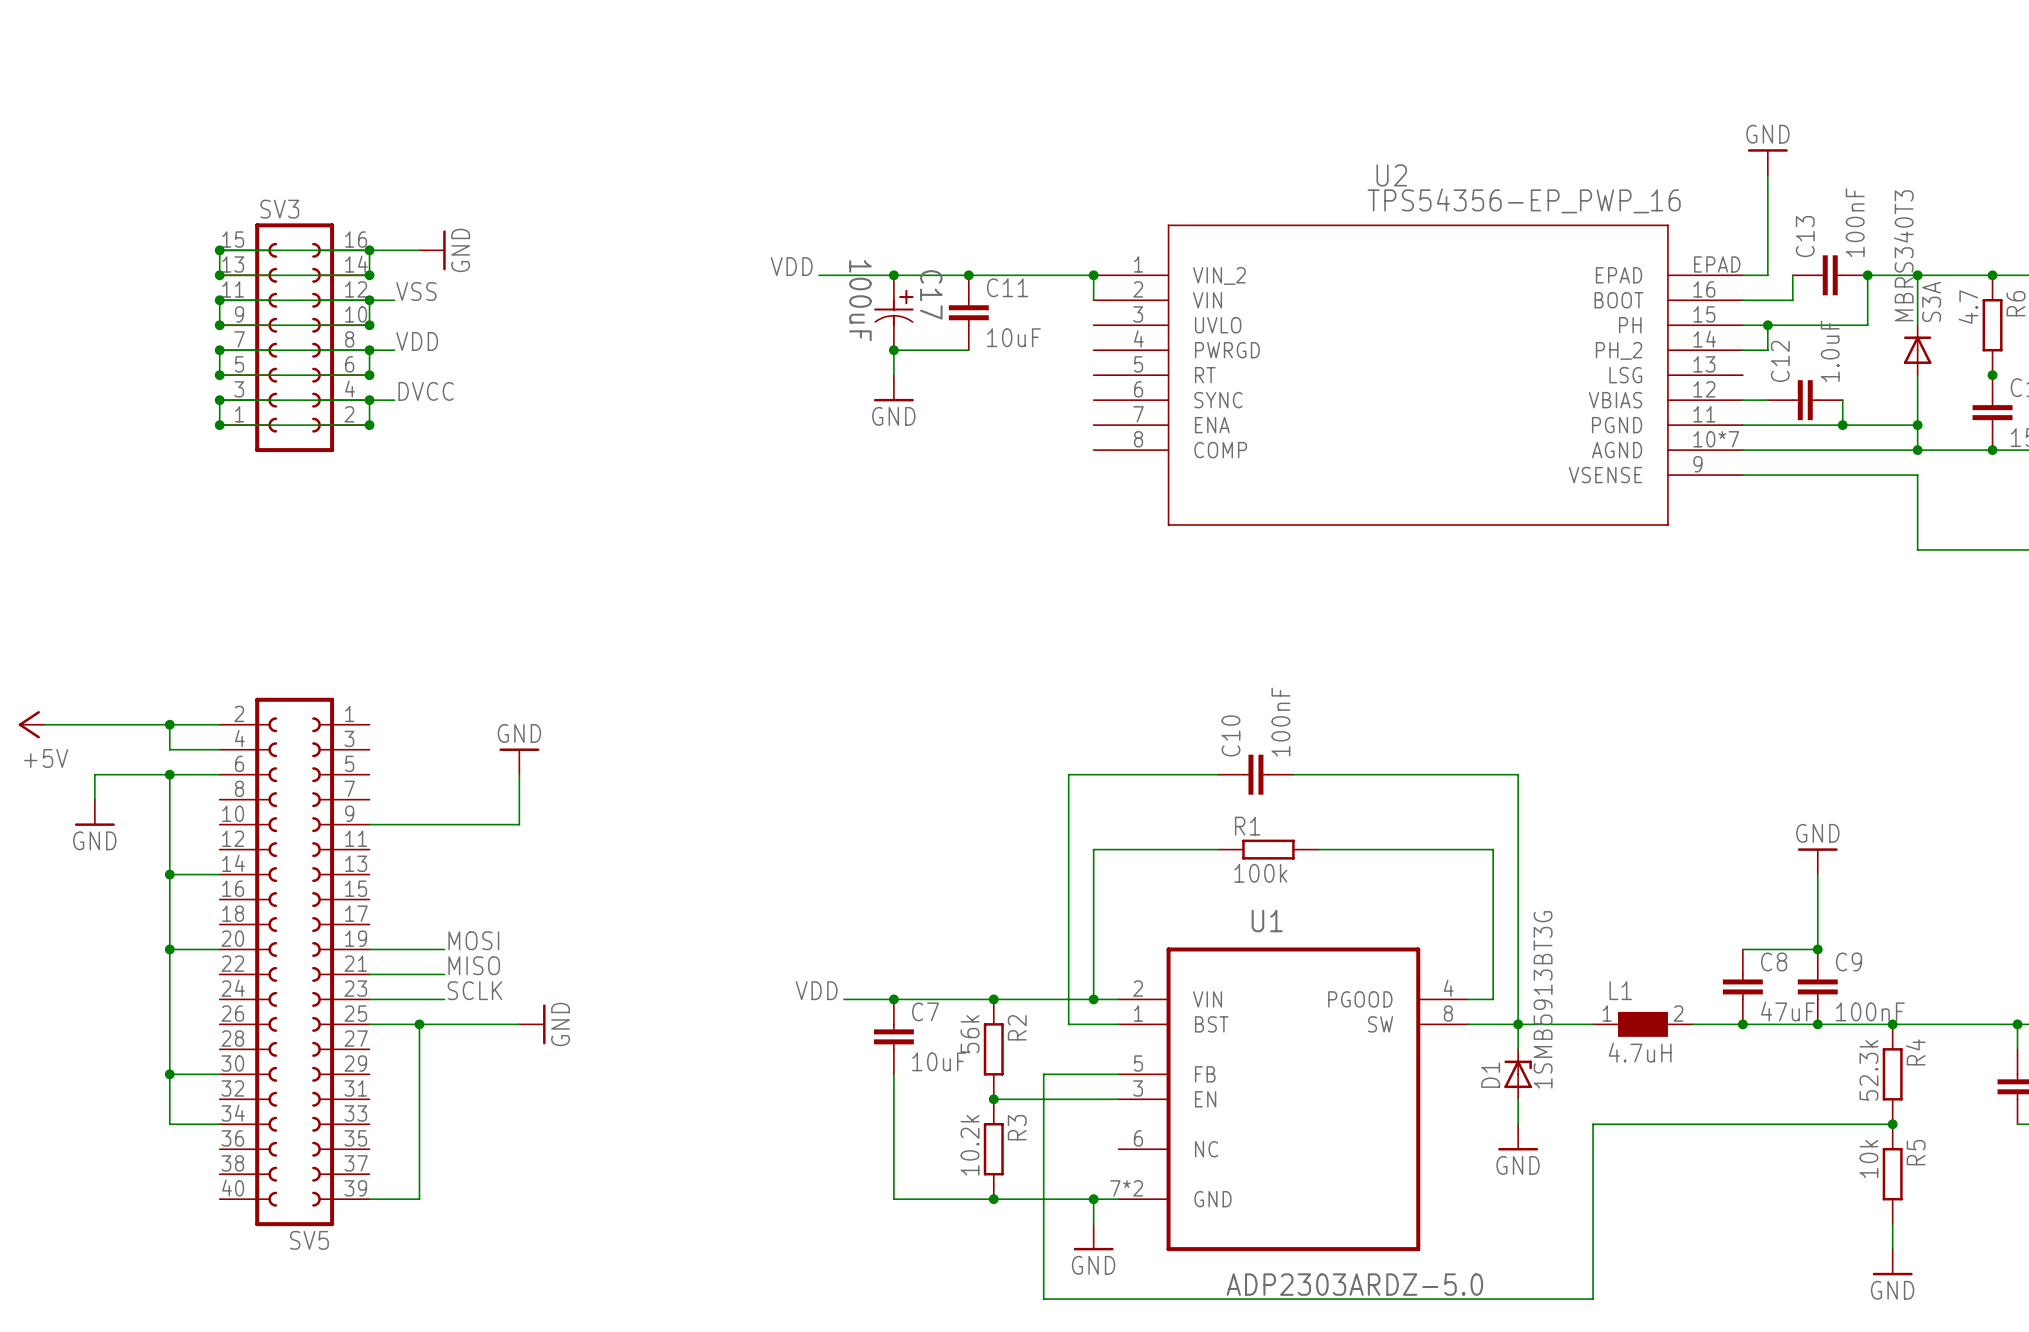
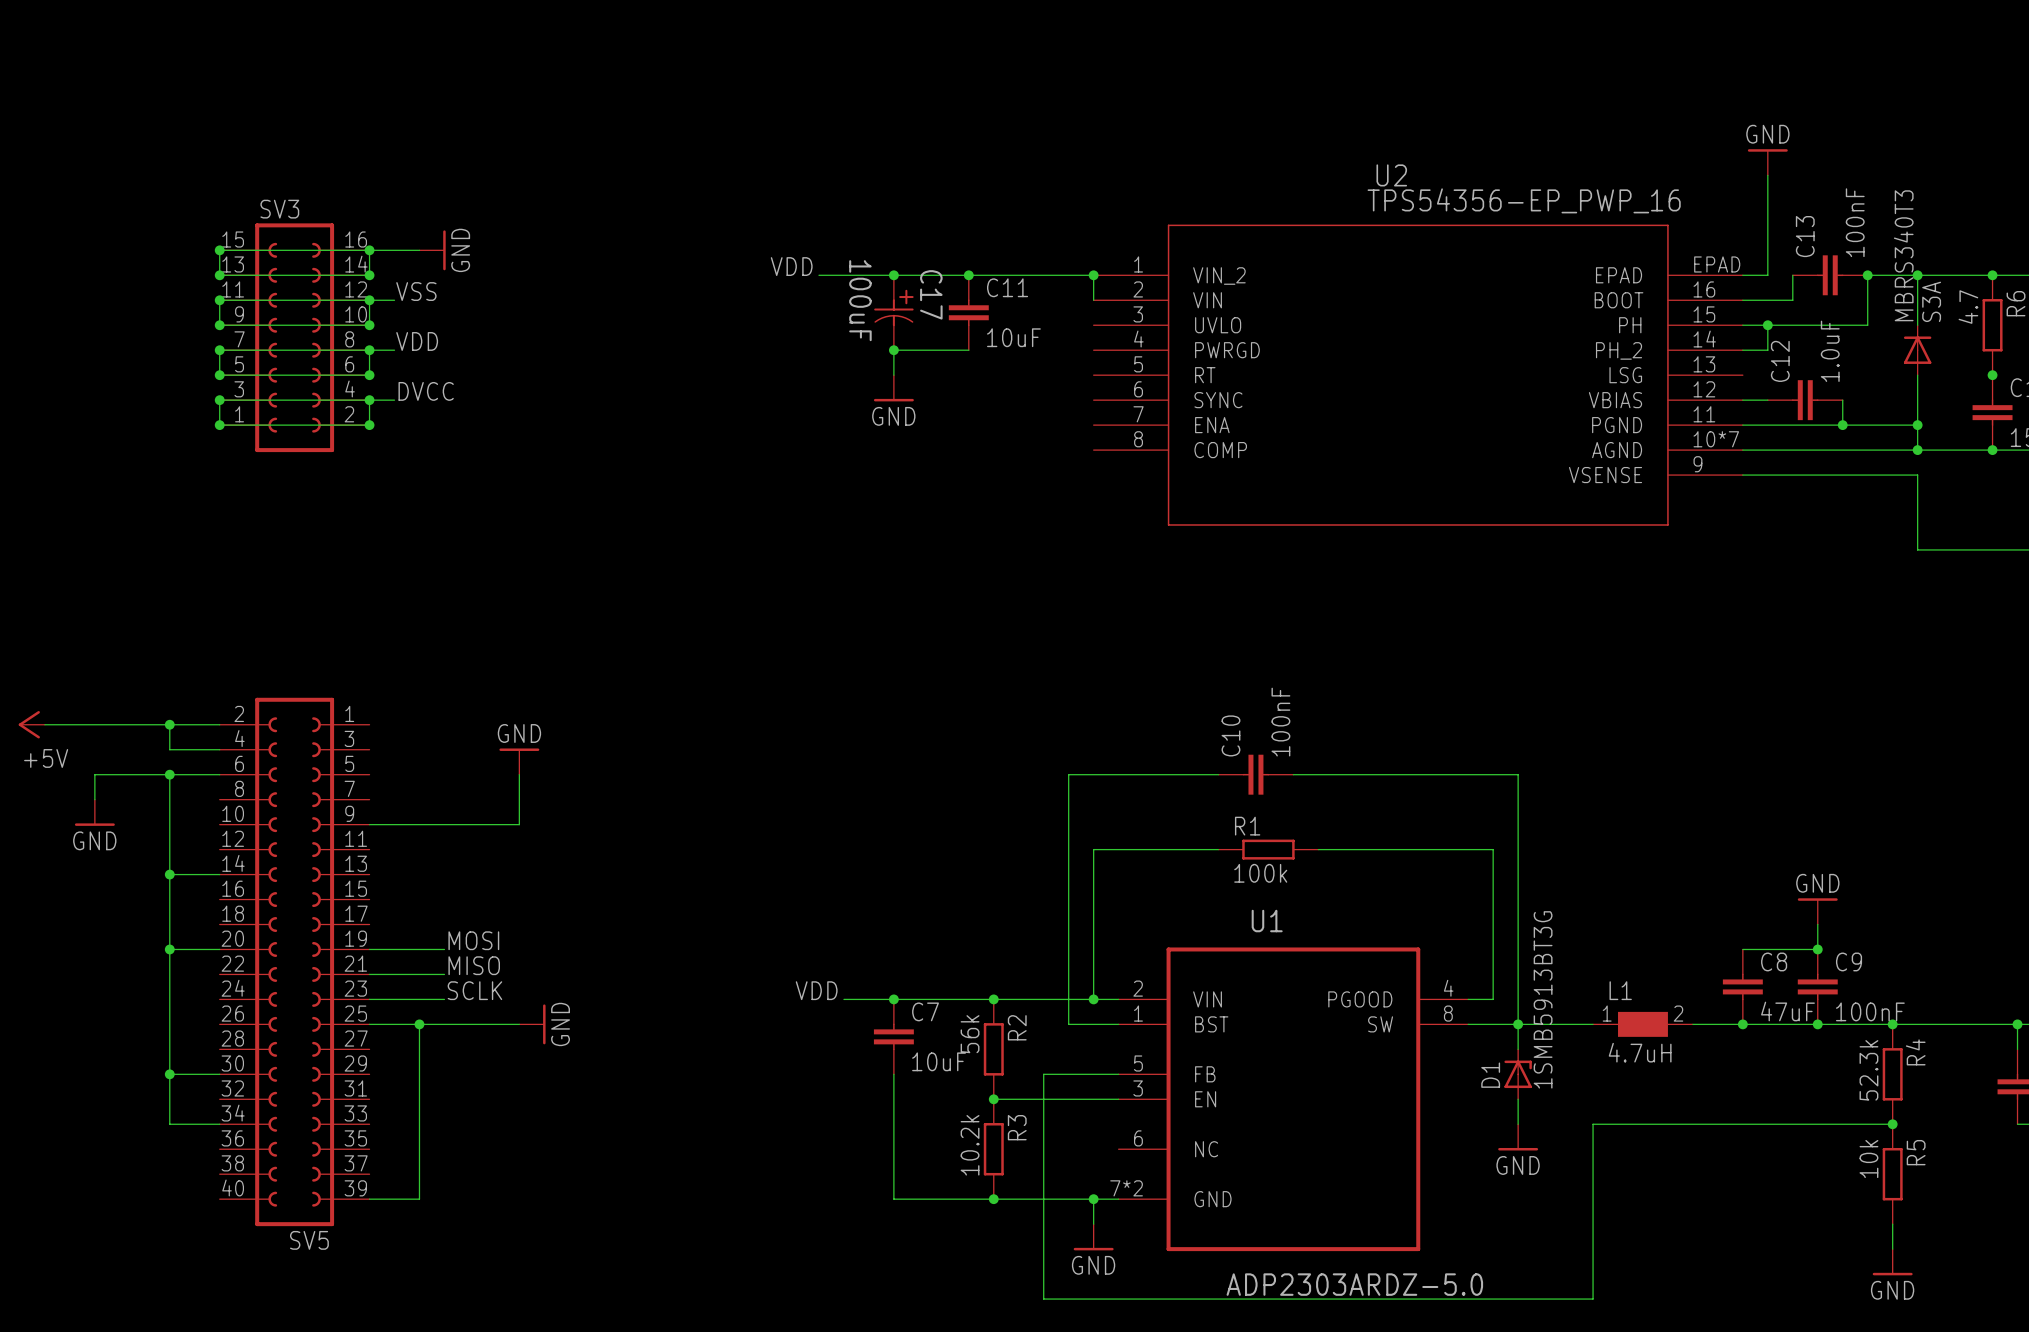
power symbol position: GND (1817, 861) -> GND (1817, 911)

